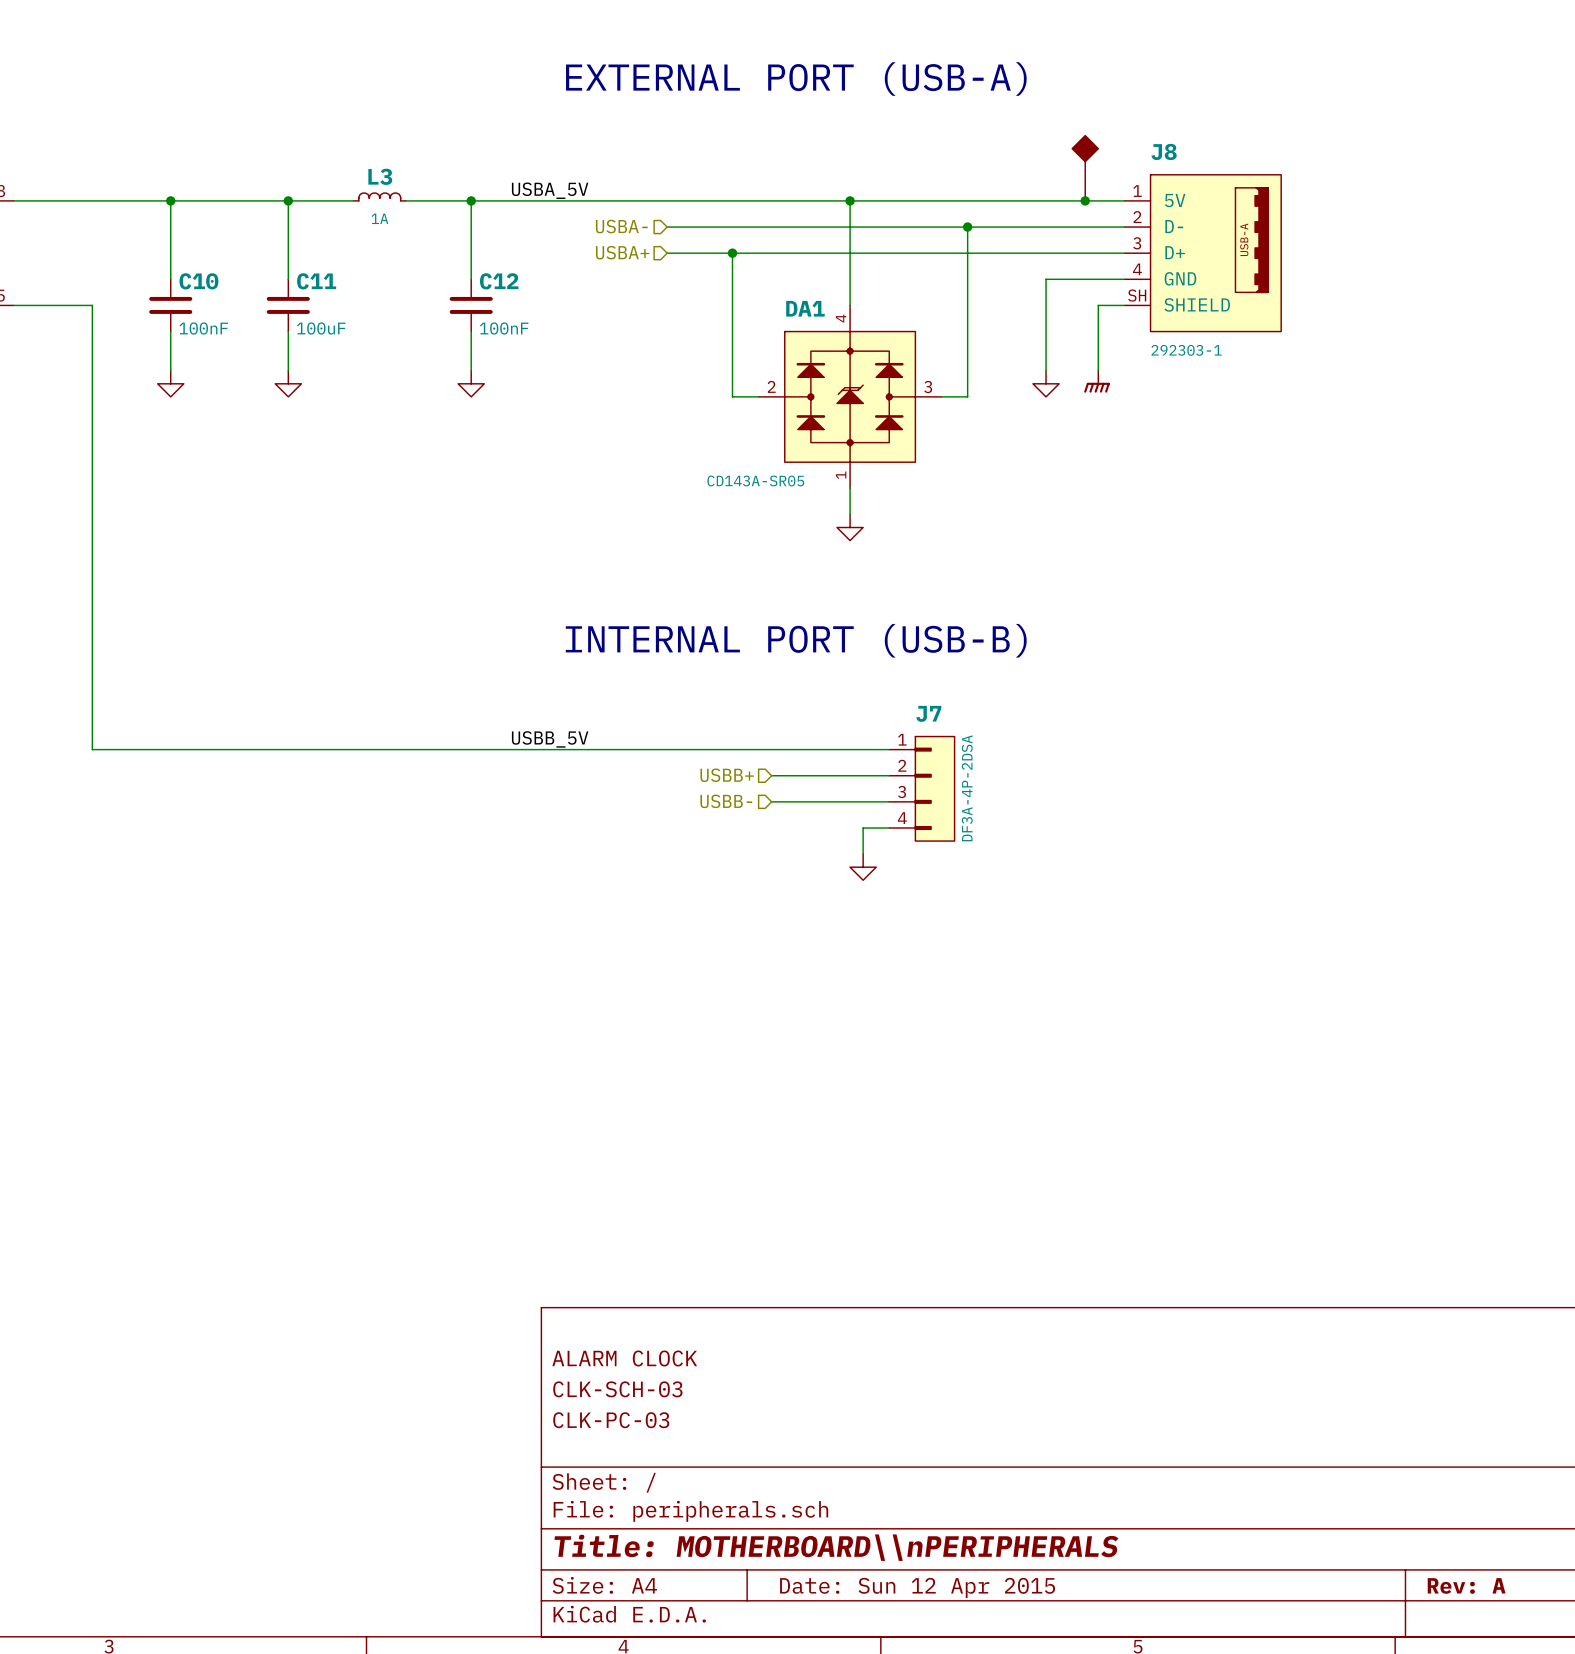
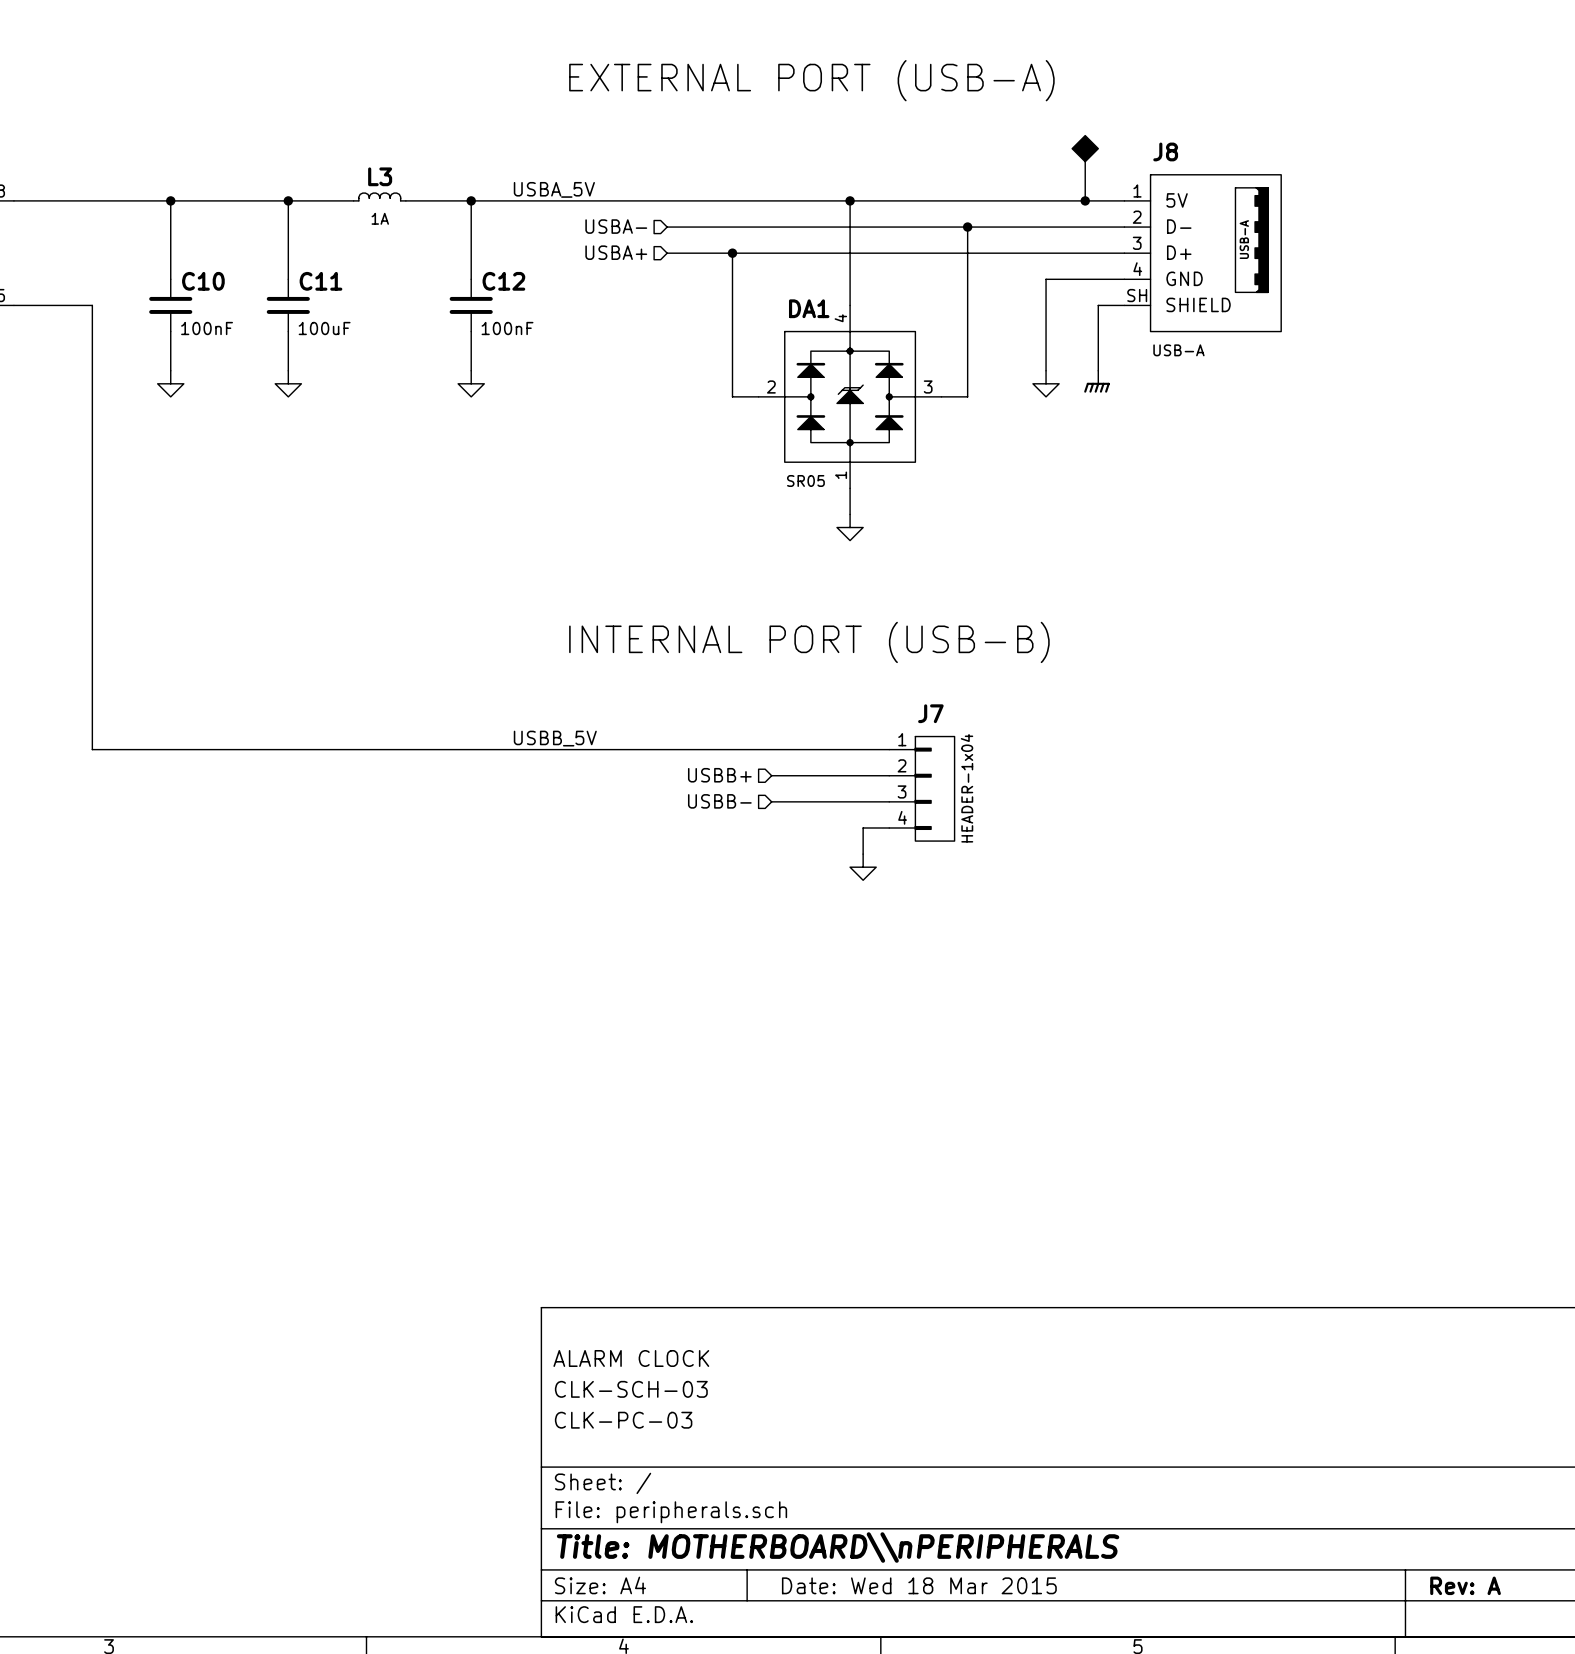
J8 value: 292303-1 (1186, 350) -> USB-A (1178, 350)
DA1 value: CD143A-SR05 (755, 480) -> SR05 (805, 480)
J7 value: DF3A-4P-2DSA (967, 788) -> HEADER-1x04 (967, 788)
title block: Date: Sun 12 Apr 2015 (917, 1587) -> Date: Wed 18 Mar 2015 (919, 1585)

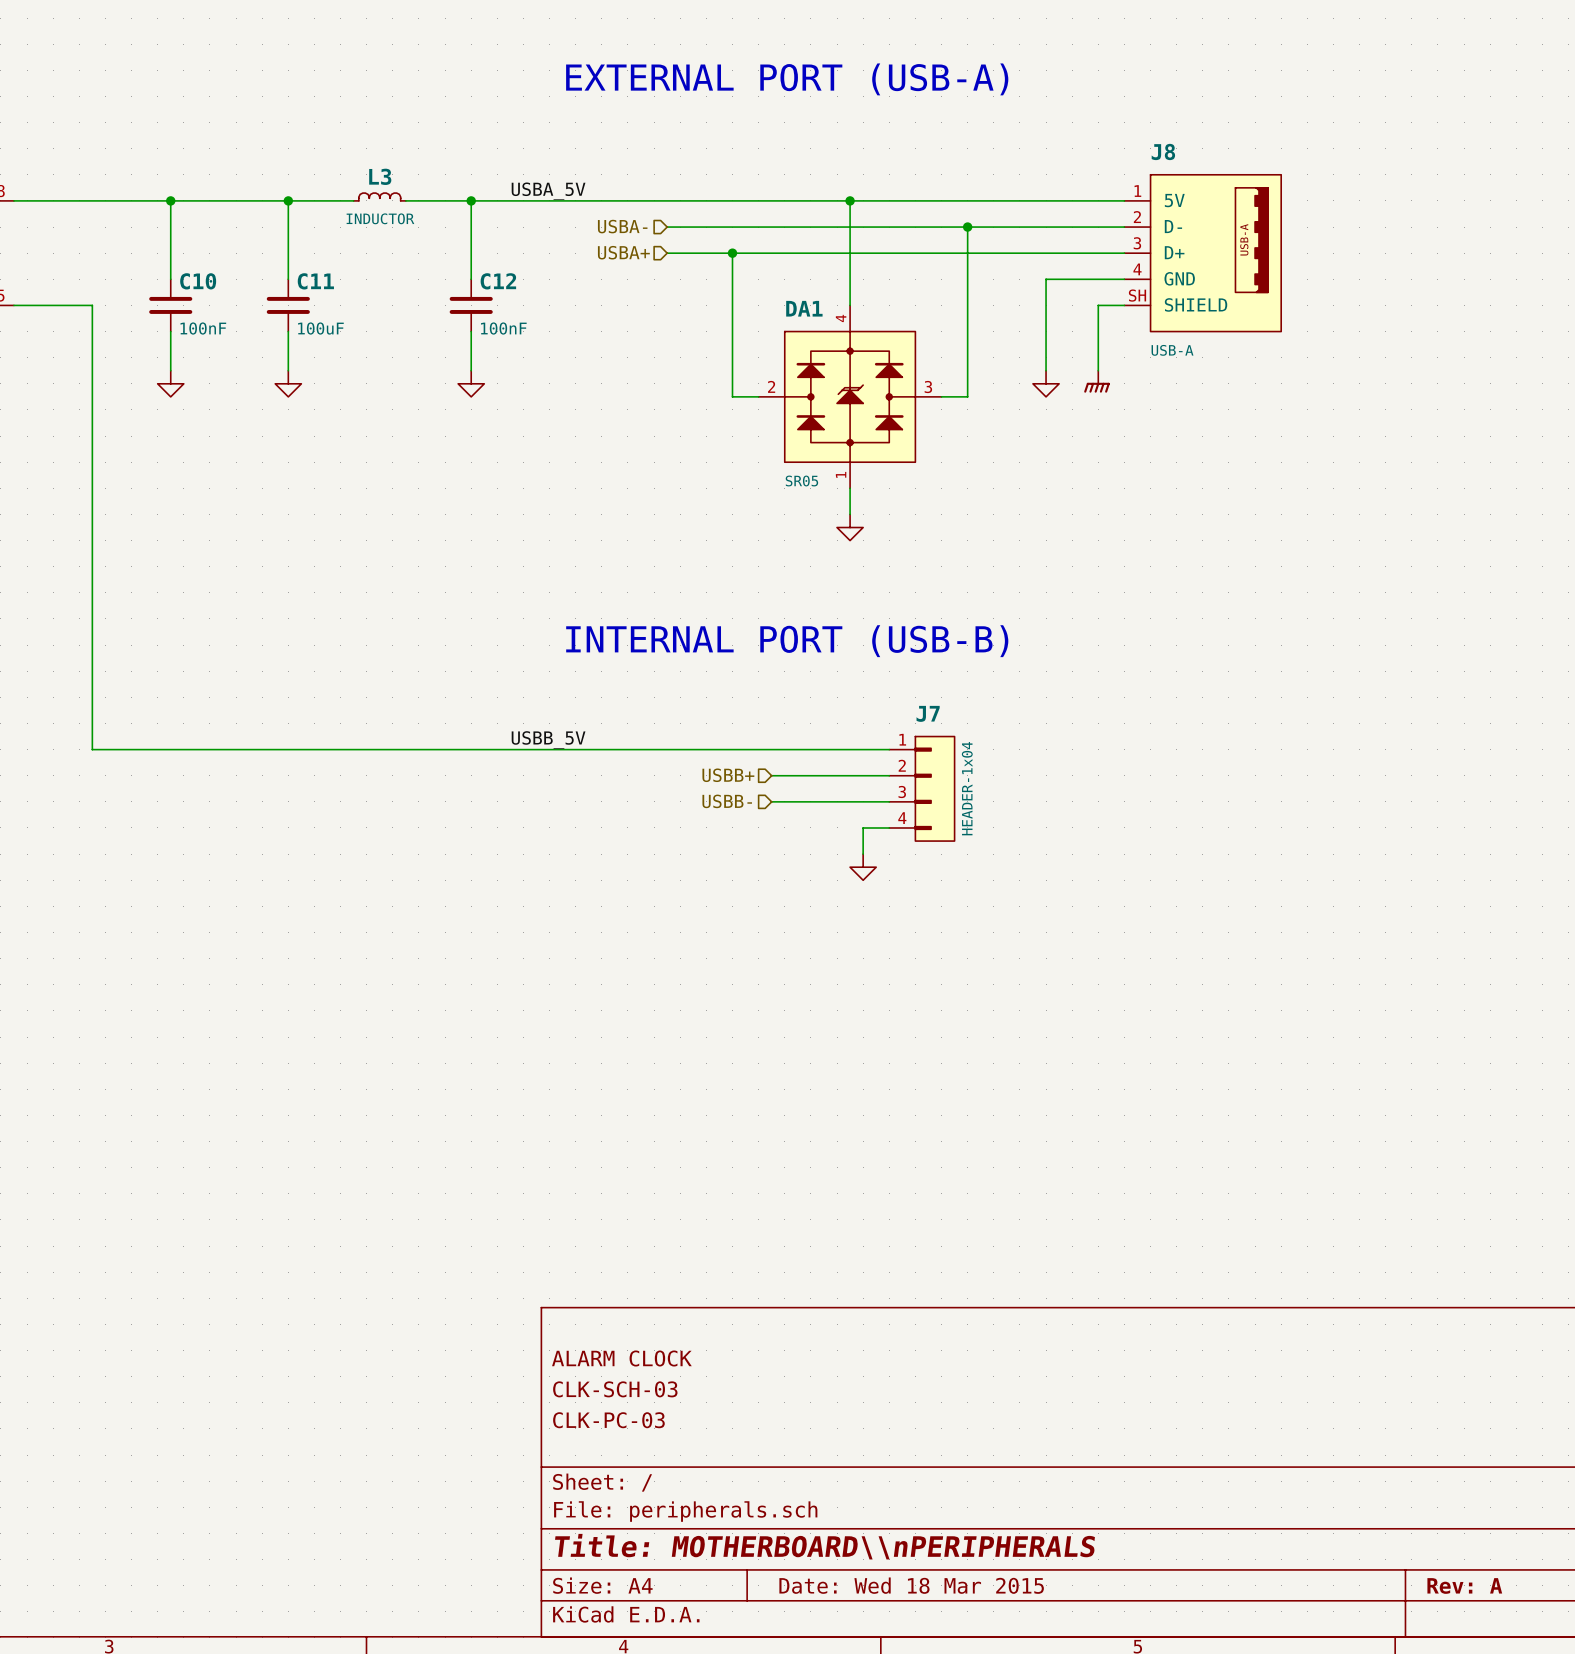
power symbol: (1085, 168) -> none
junction: (1085, 200) -> none
L3 value: 1A (380, 218) -> INDUCTOR (380, 218)

